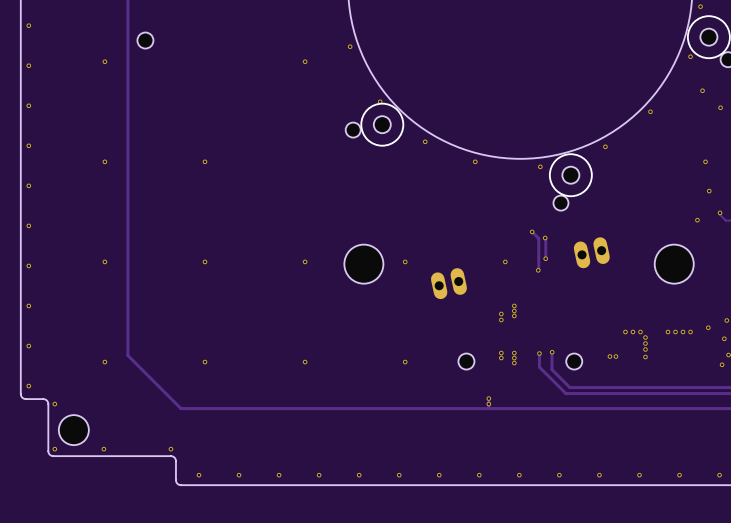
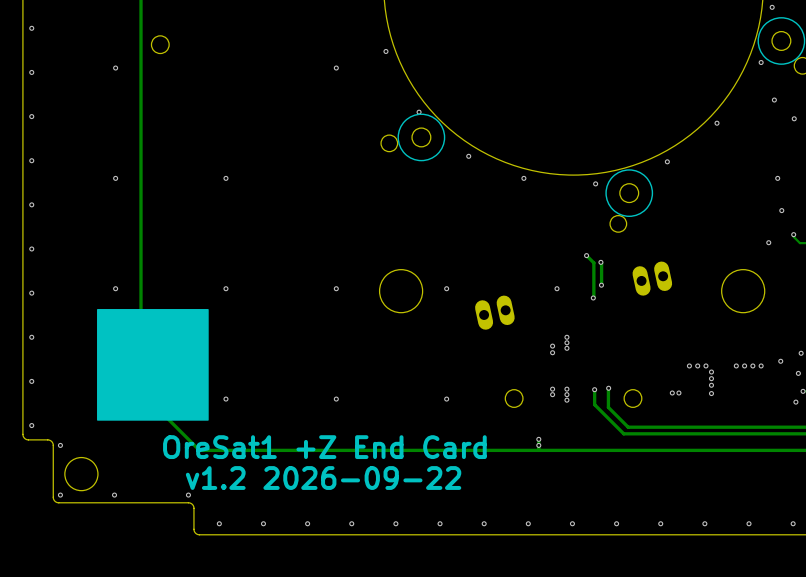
drawing: none -> [97, 309, 209, 421]
text: none -> OreSat1 +Z End Card (324, 447)
text: none -> v1.2 2026-09-22 (323, 478)

